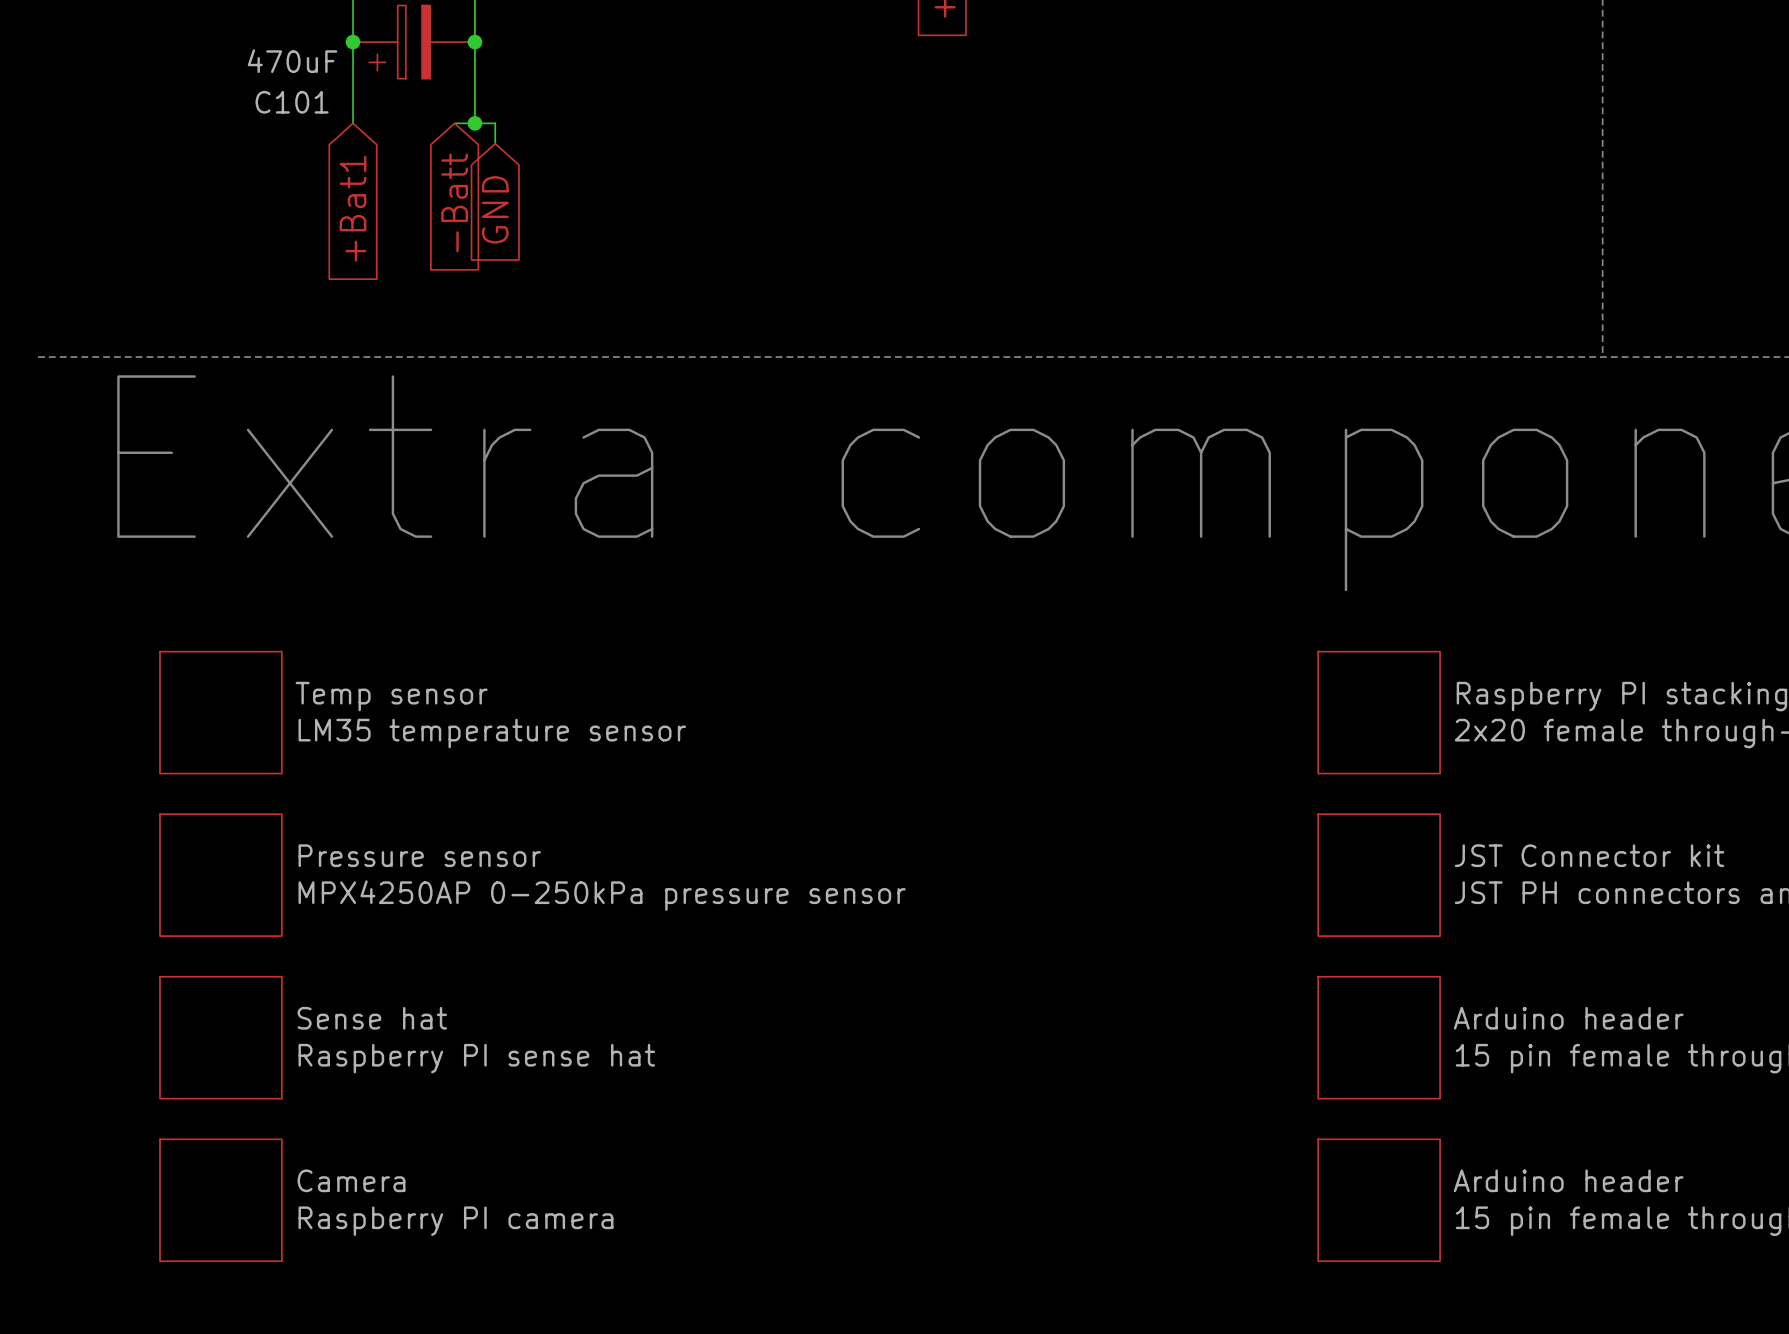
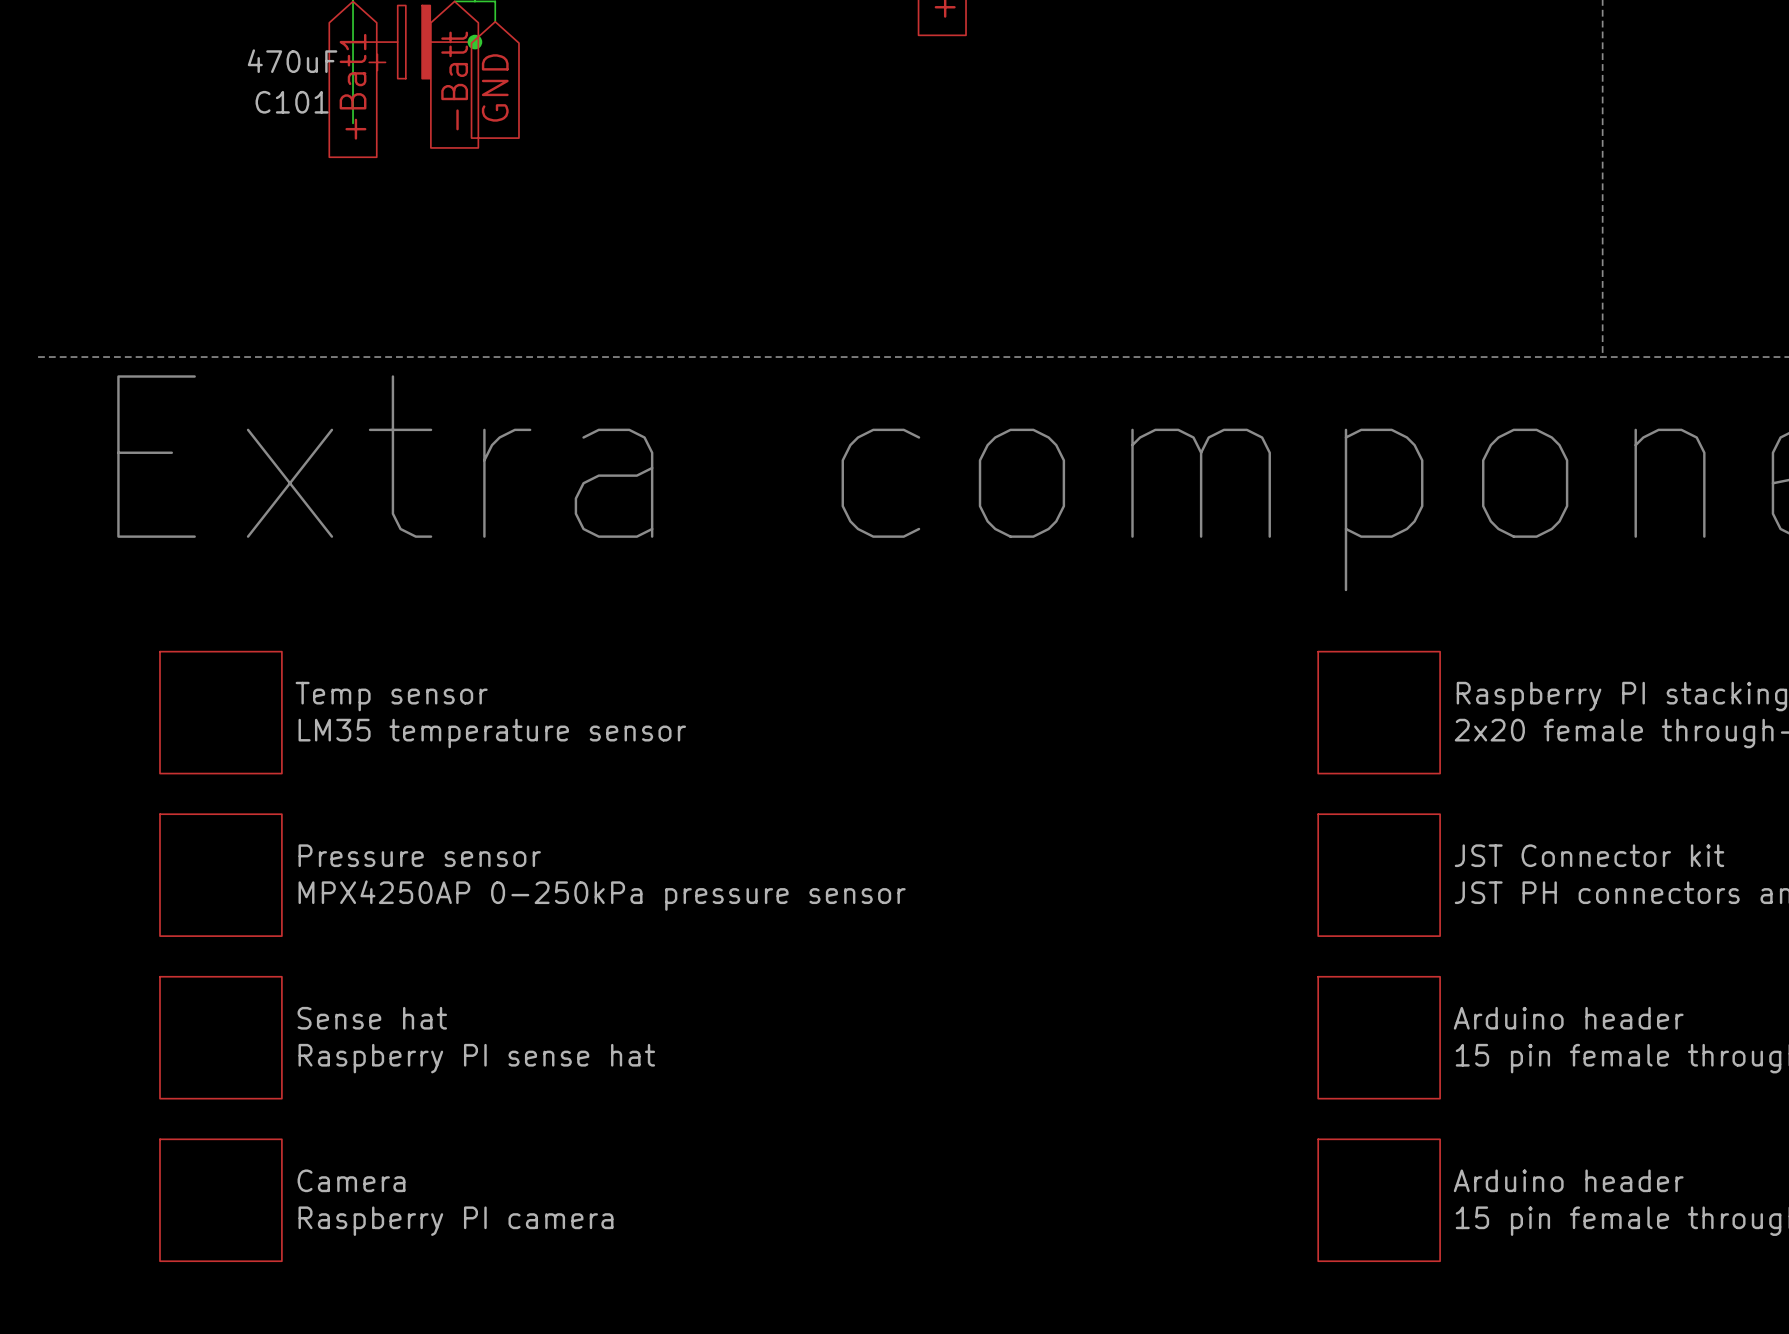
wire: (474, 1) (474, 123) -> none
junction: (353, 42) -> none
wire: (454, 123) (495, 123) (495, 143) -> (454, 1) (495, 1) (495, 21)
junction: (474, 123) -> none
global label position: -Batt (454, 202) -> -Batt (454, 80)
global label position: +Bat1 (353, 208) -> +Bat1 (353, 86)
global label position: GND (495, 209) -> GND (495, 87)

